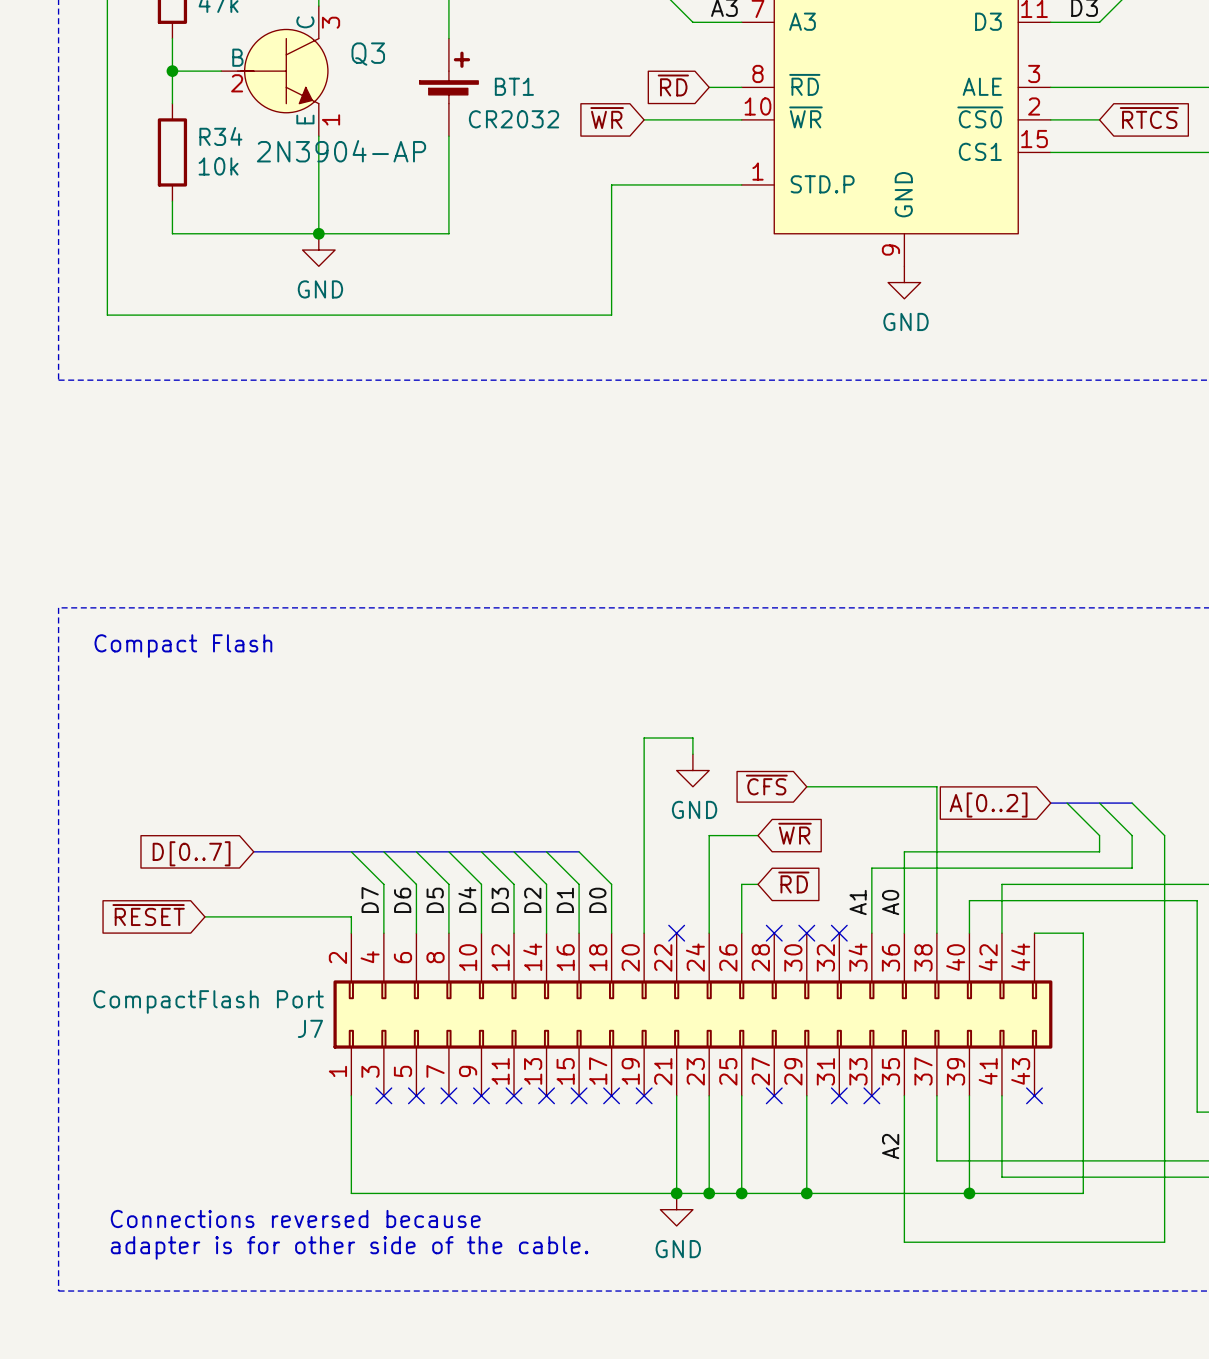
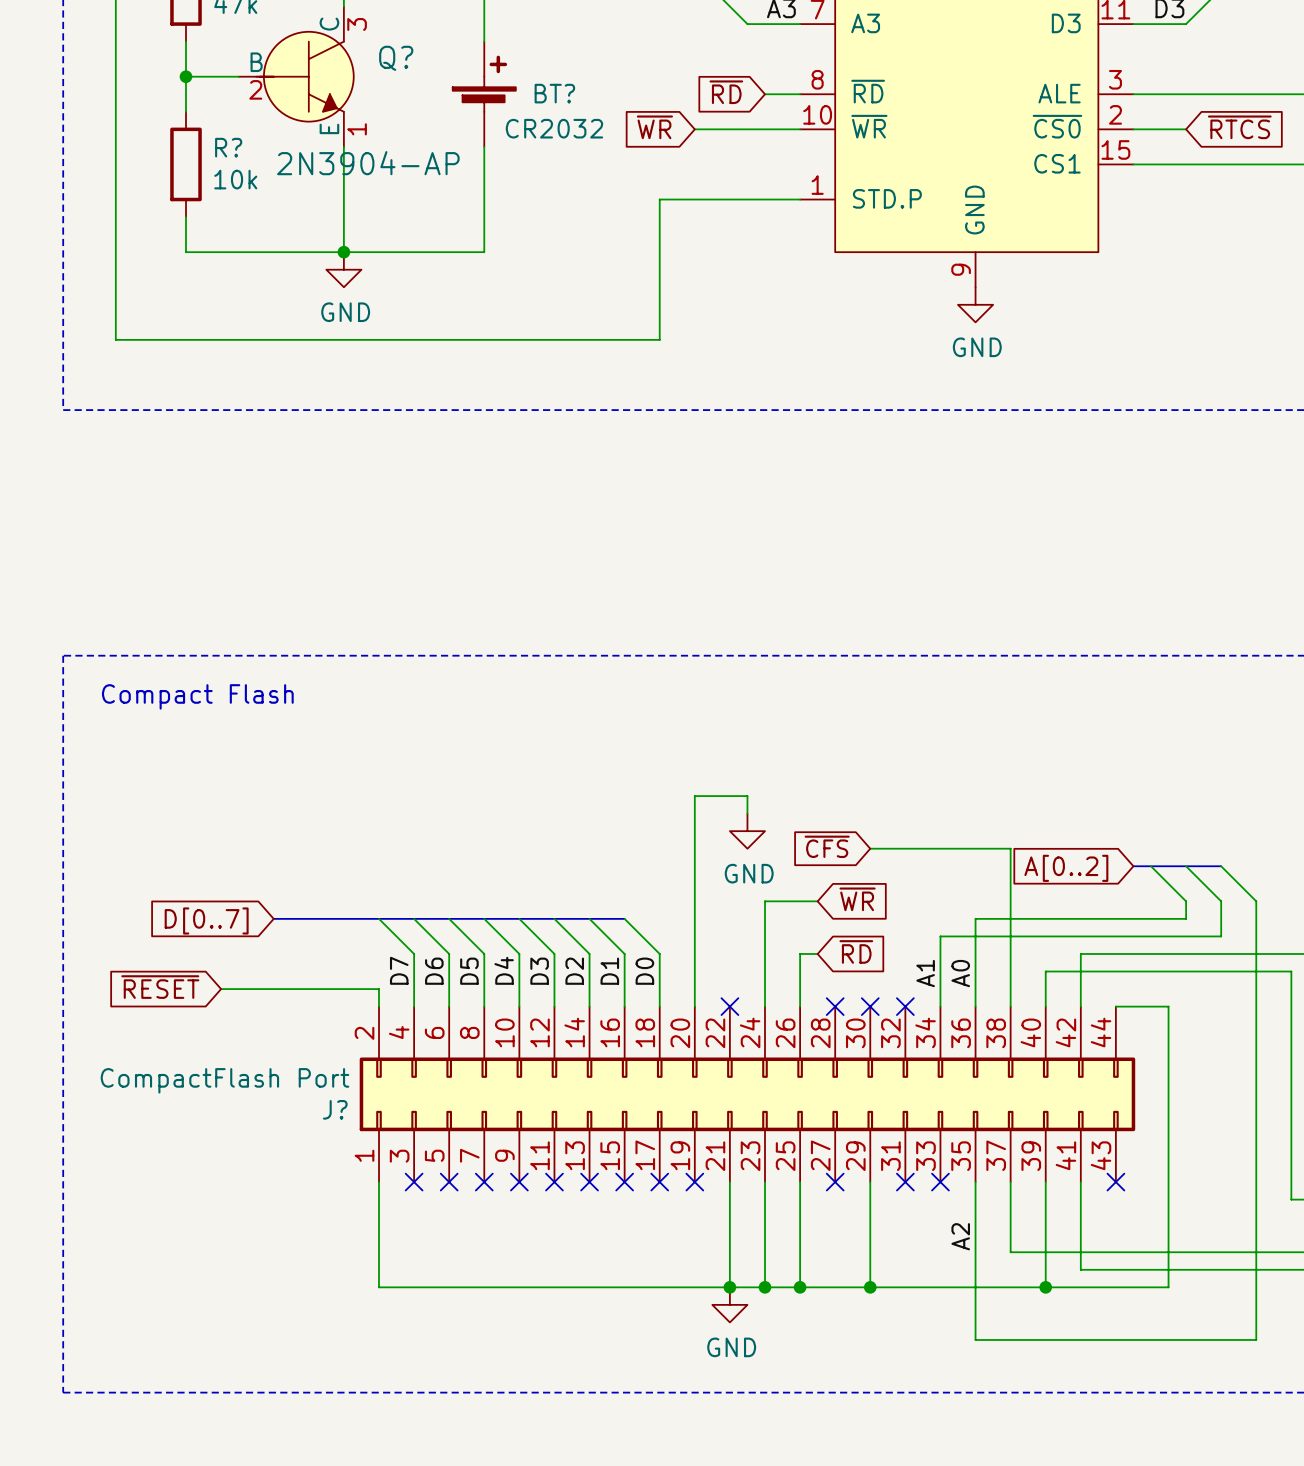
Q3 name: Q3 (368, 54) -> Q? (396, 58)
BT1 name: BT1 (514, 86) -> BT? (554, 93)
R34 name: R34 (220, 136) -> R? (228, 147)
J7 name: J7 (310, 1028) -> J? (335, 1109)
text: Connections reversed because (295, 1218) -> none
text: adapter is for other side of the cable. (349, 1247) -> none

